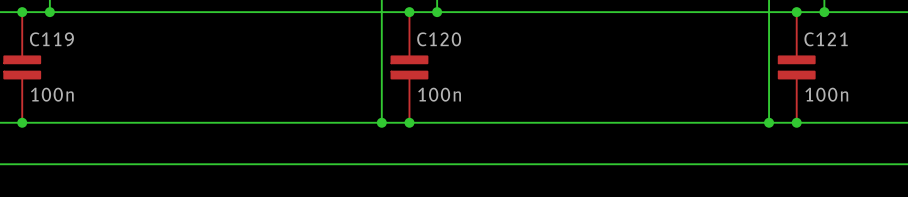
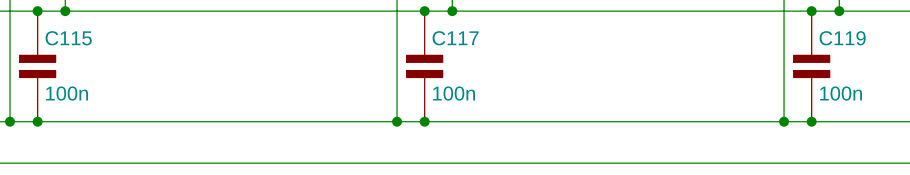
C119 name: C119 (51, 39) -> C115 (68, 38)
C120 name: C120 (439, 39) -> C117 (455, 38)
C121 name: C121 (826, 39) -> C119 (842, 38)

